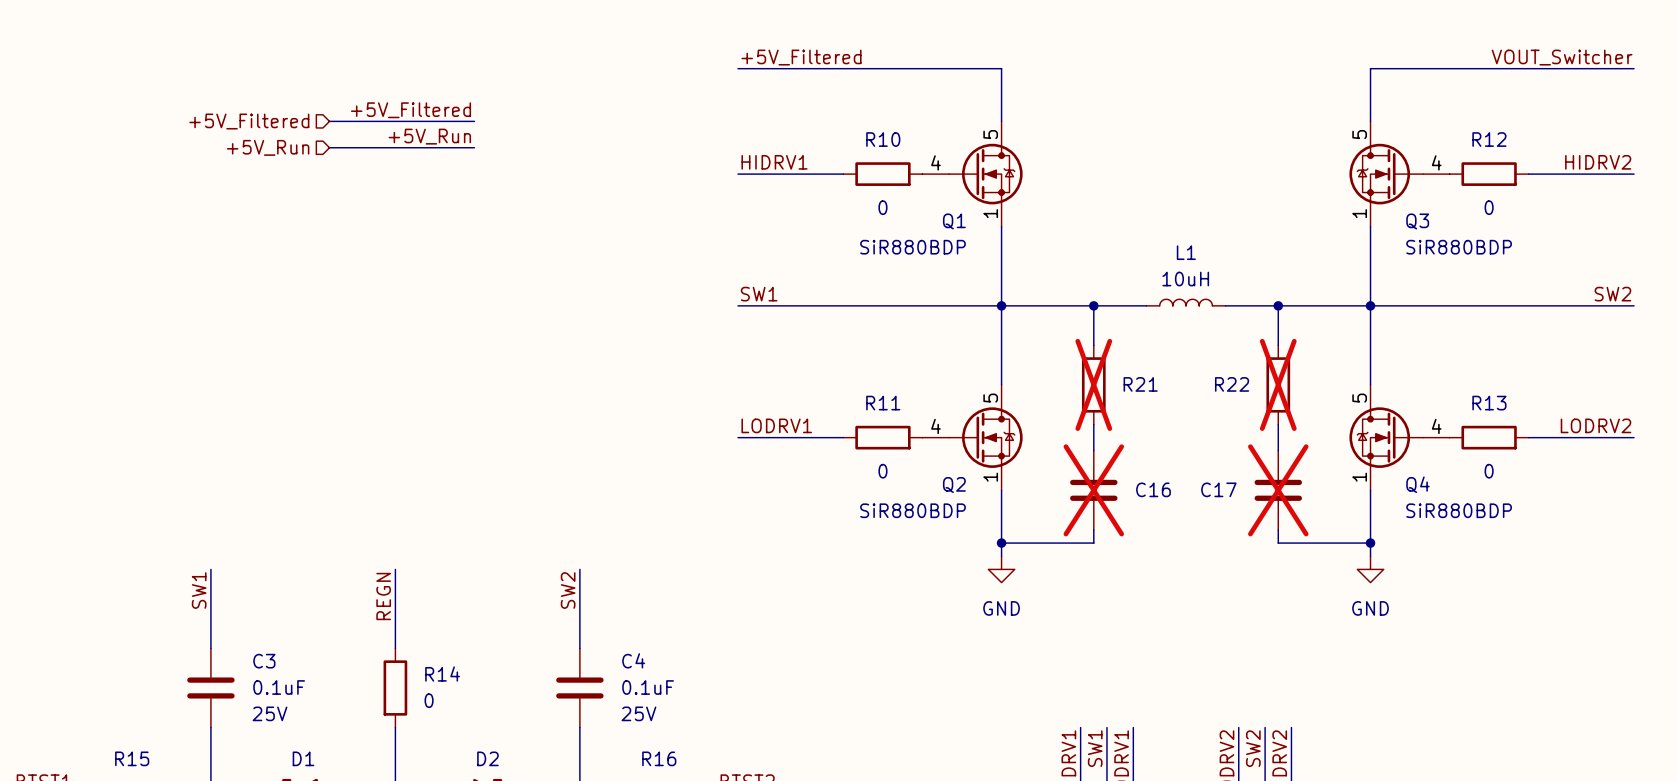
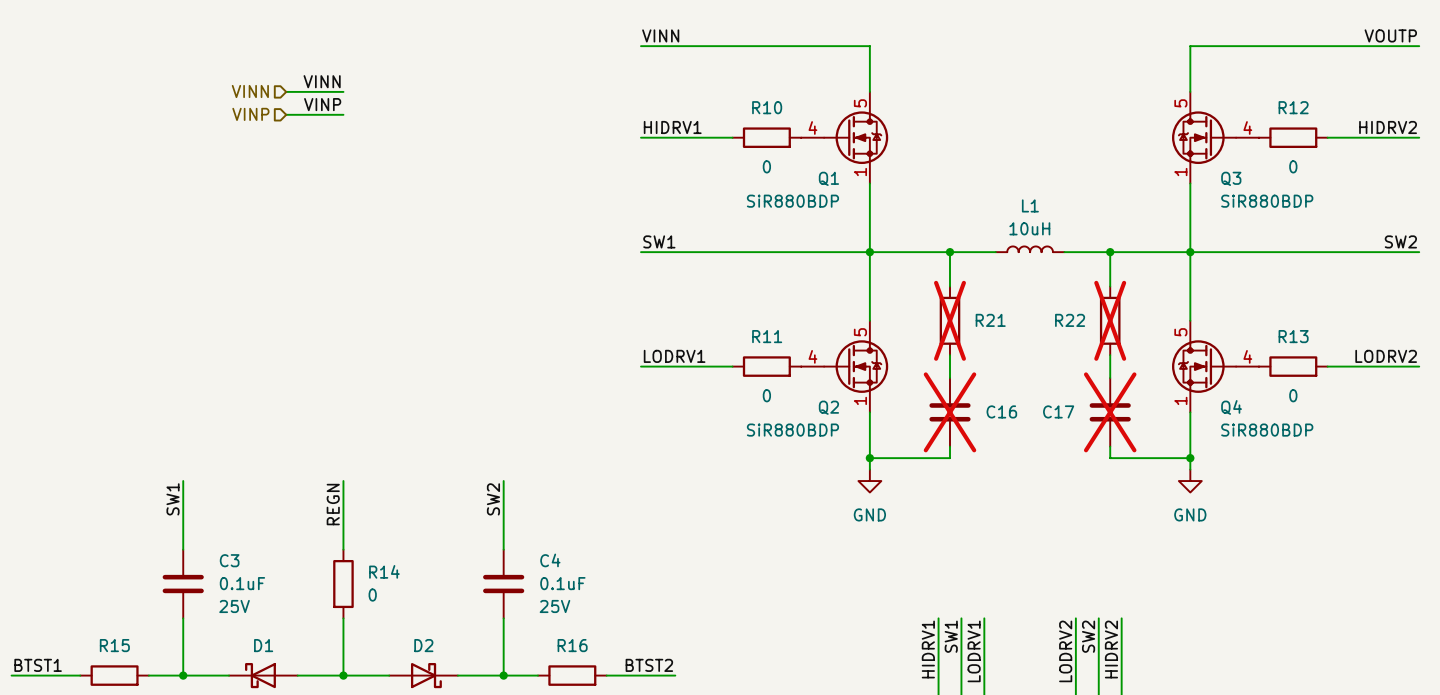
label: +5V_Filtered (801, 57) -> VINN (660, 35)
label: VOUT_Switcher (1562, 57) -> VOUTP (1390, 35)
label: none -> VINN (322, 81)
label: +5V_Filtered (411, 110) -> none
hierarchical label: +5V_Filtered (249, 121) -> VINN (250, 91)
wire: (395, 121) (474, 121) -> none
label: none -> VINP (322, 104)
label: +5V_Run (429, 136) -> none
hierarchical label: +5V_Run (268, 147) -> VINP (250, 114)
wire: (395, 147) (474, 147) -> none

